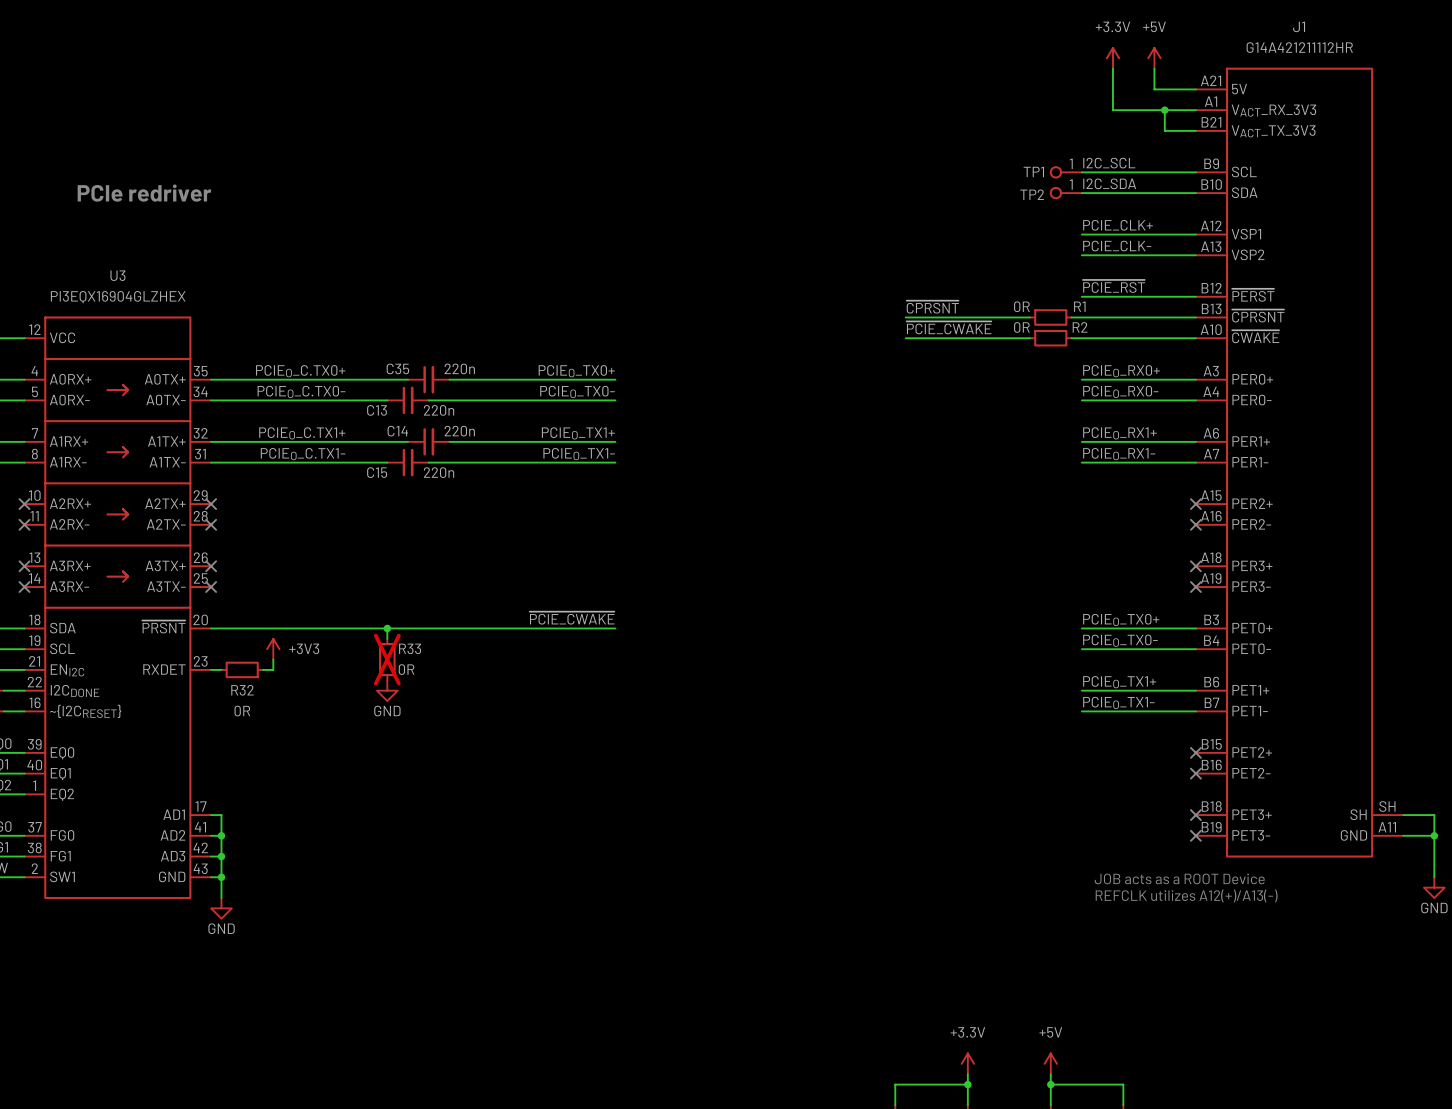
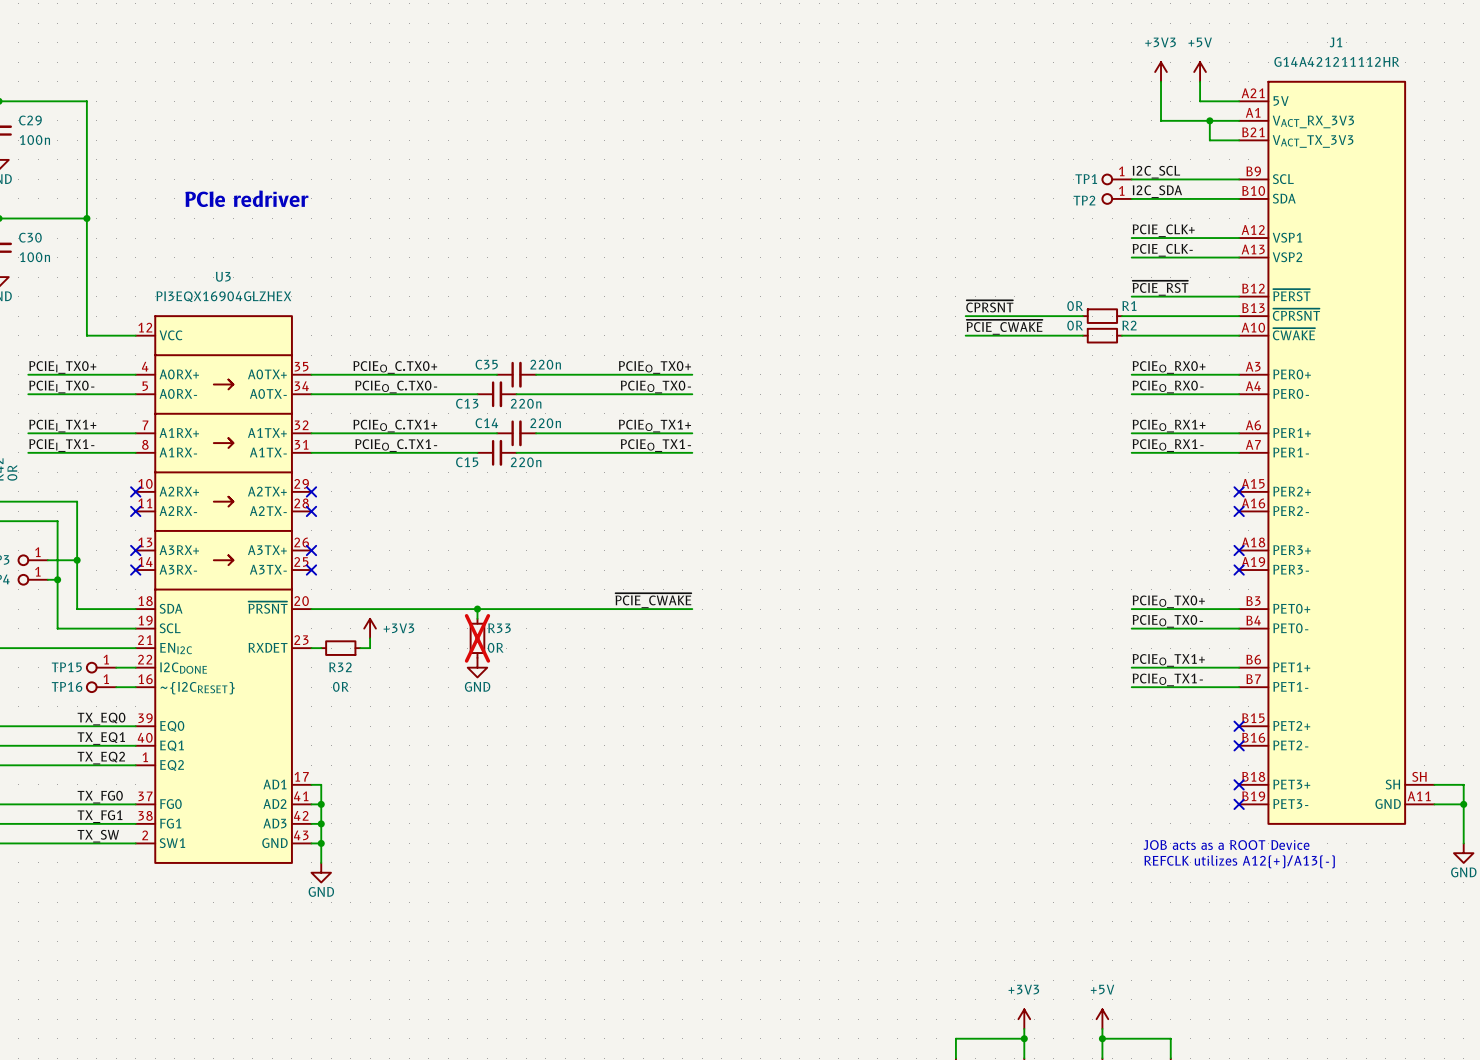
power symbol: +3.3V (1112, 58) -> +3V3 (1161, 72)
power symbol: +3.3V (967, 1063) -> +3V3 (1024, 1019)

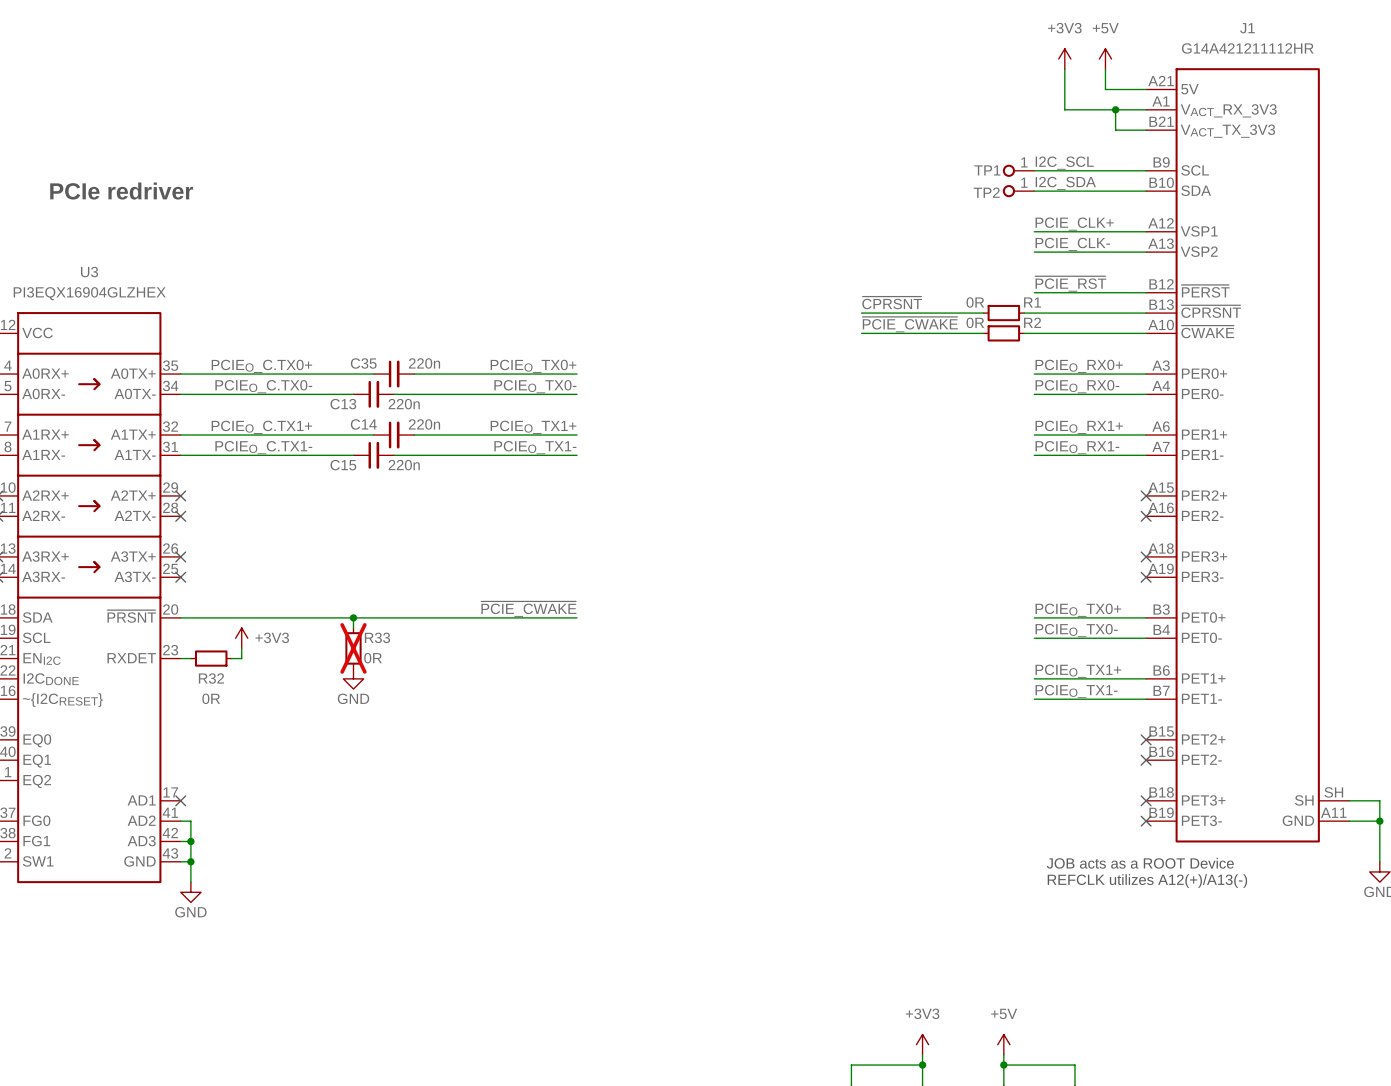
wire: (311, 784) (321, 784) (321, 804) -> none
no-connect mark: none -> (180, 800)
junction: (321, 804) -> none

